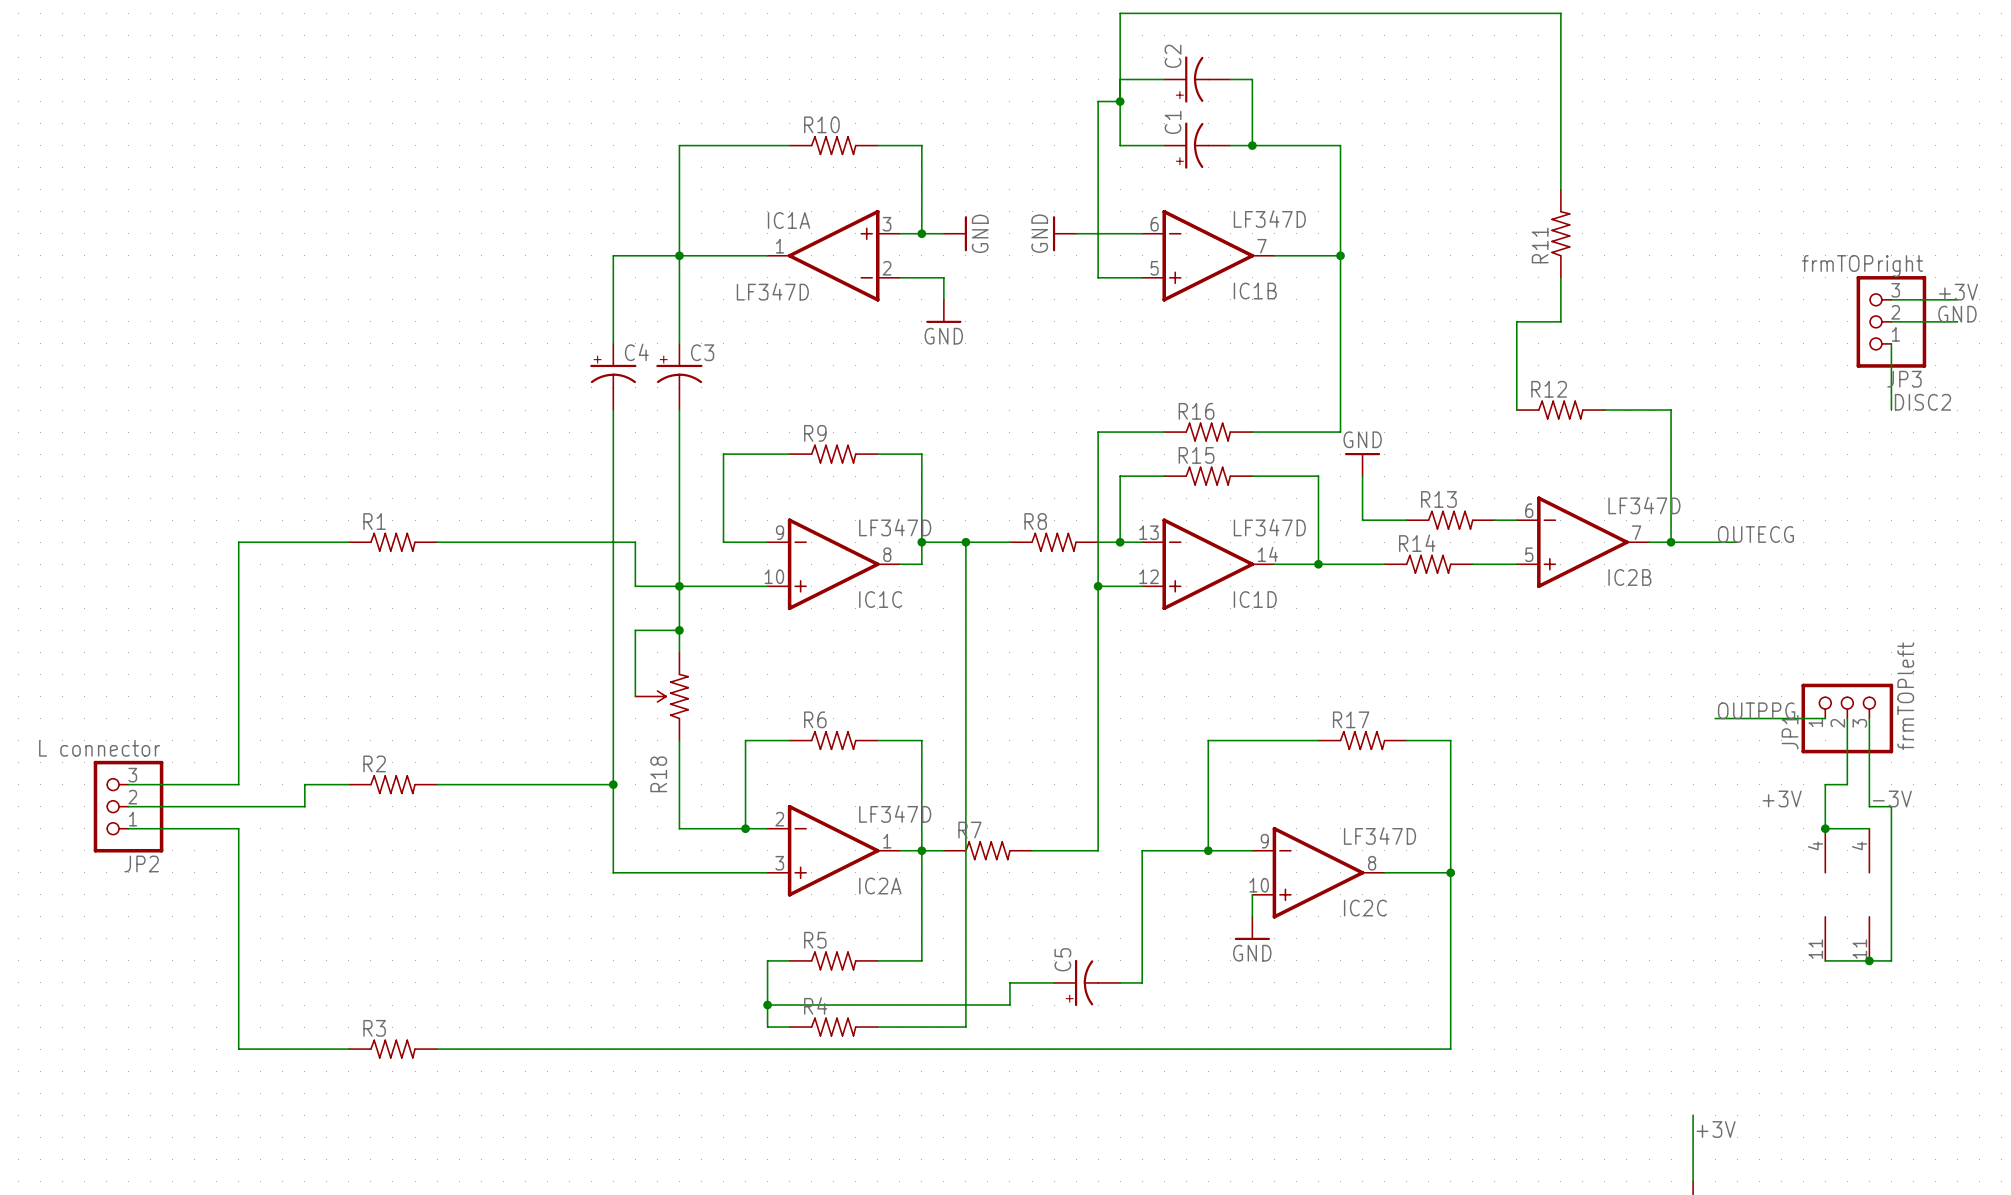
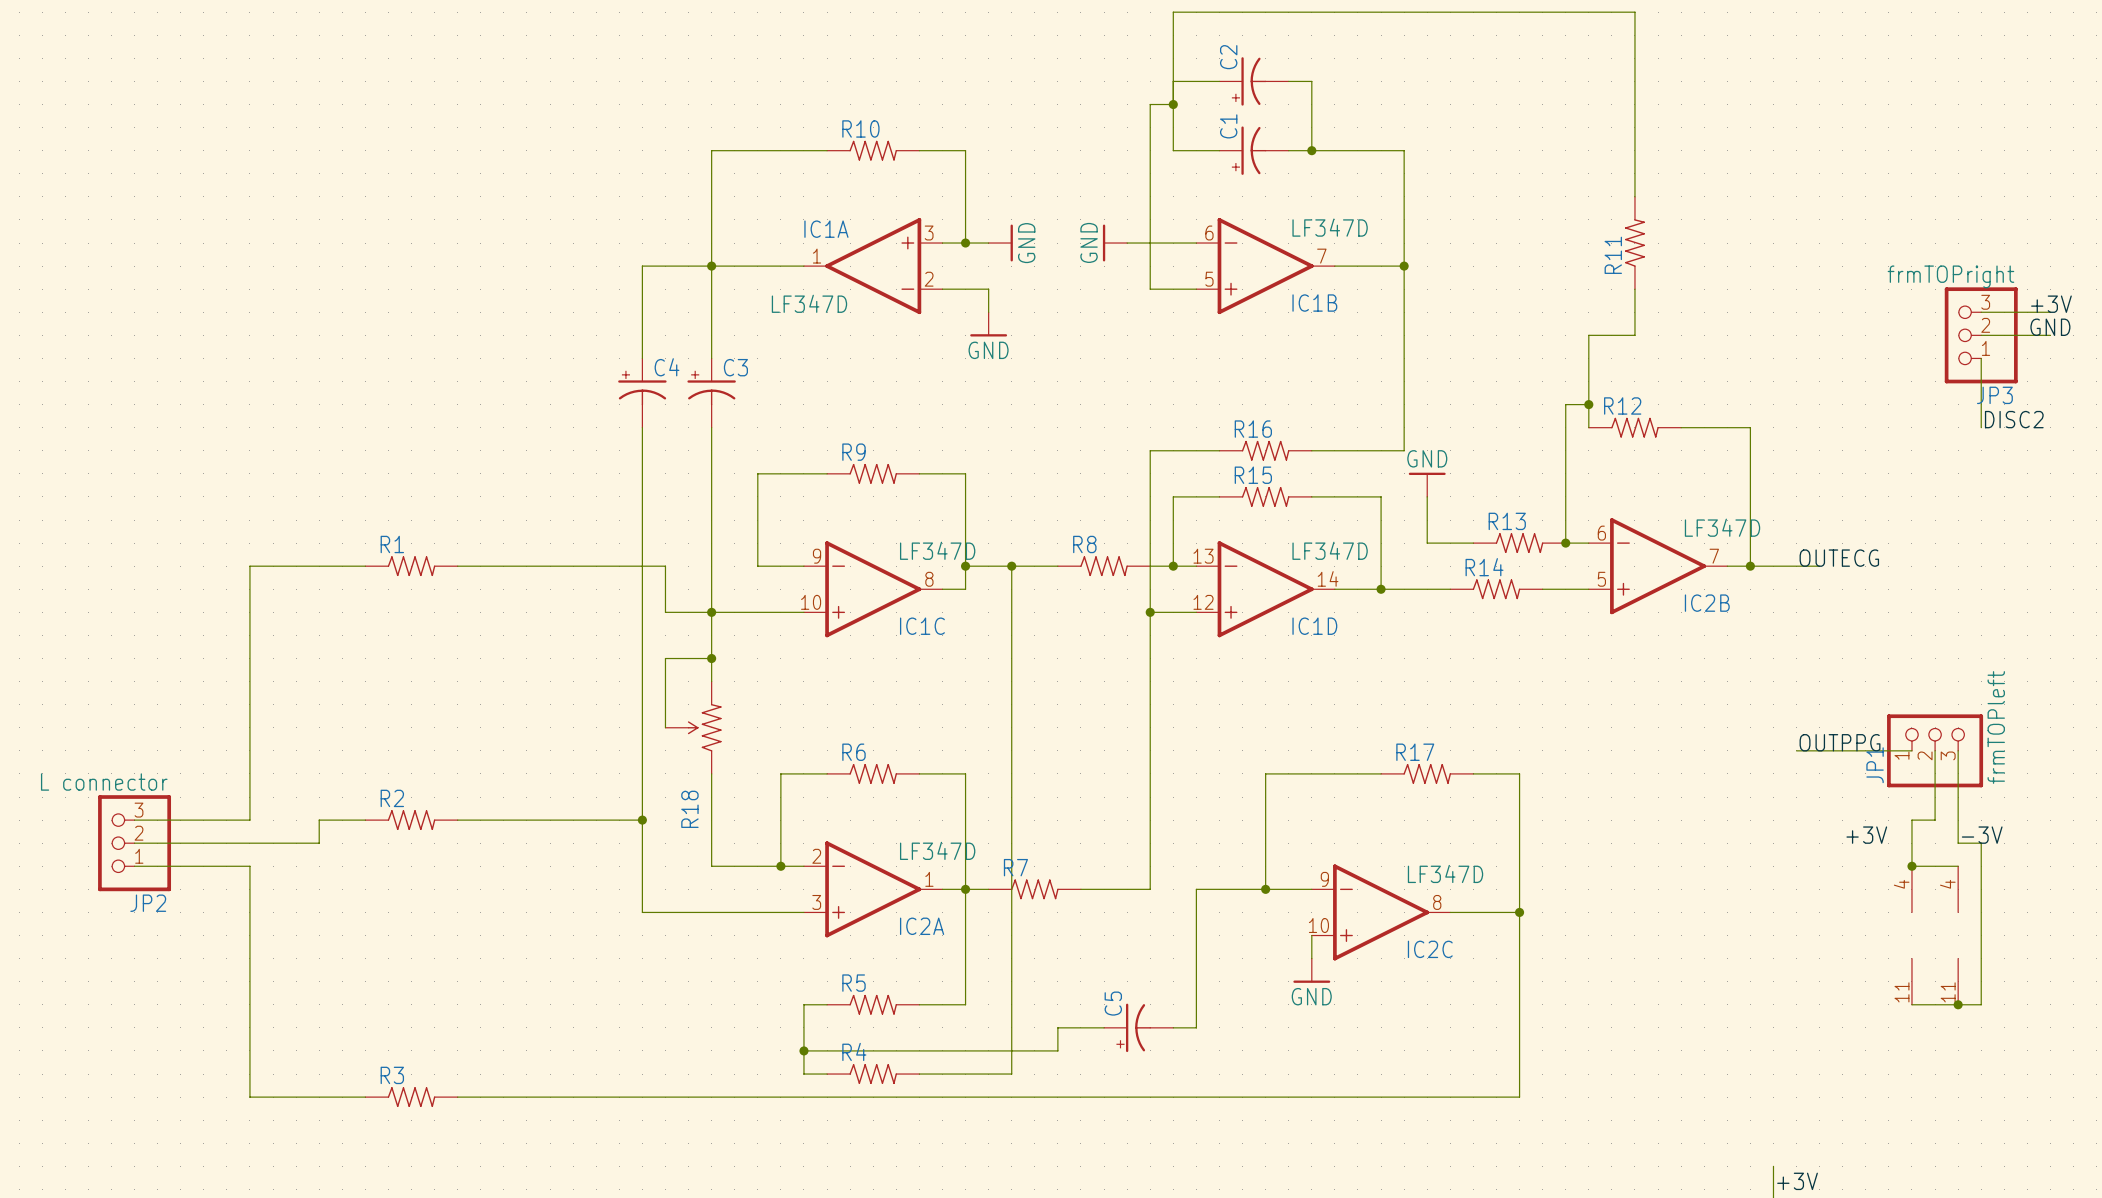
wire: none -> (1588, 404) (1565, 404) (1565, 543)
junction: none -> (1588, 404)
junction: none -> (1565, 543)

